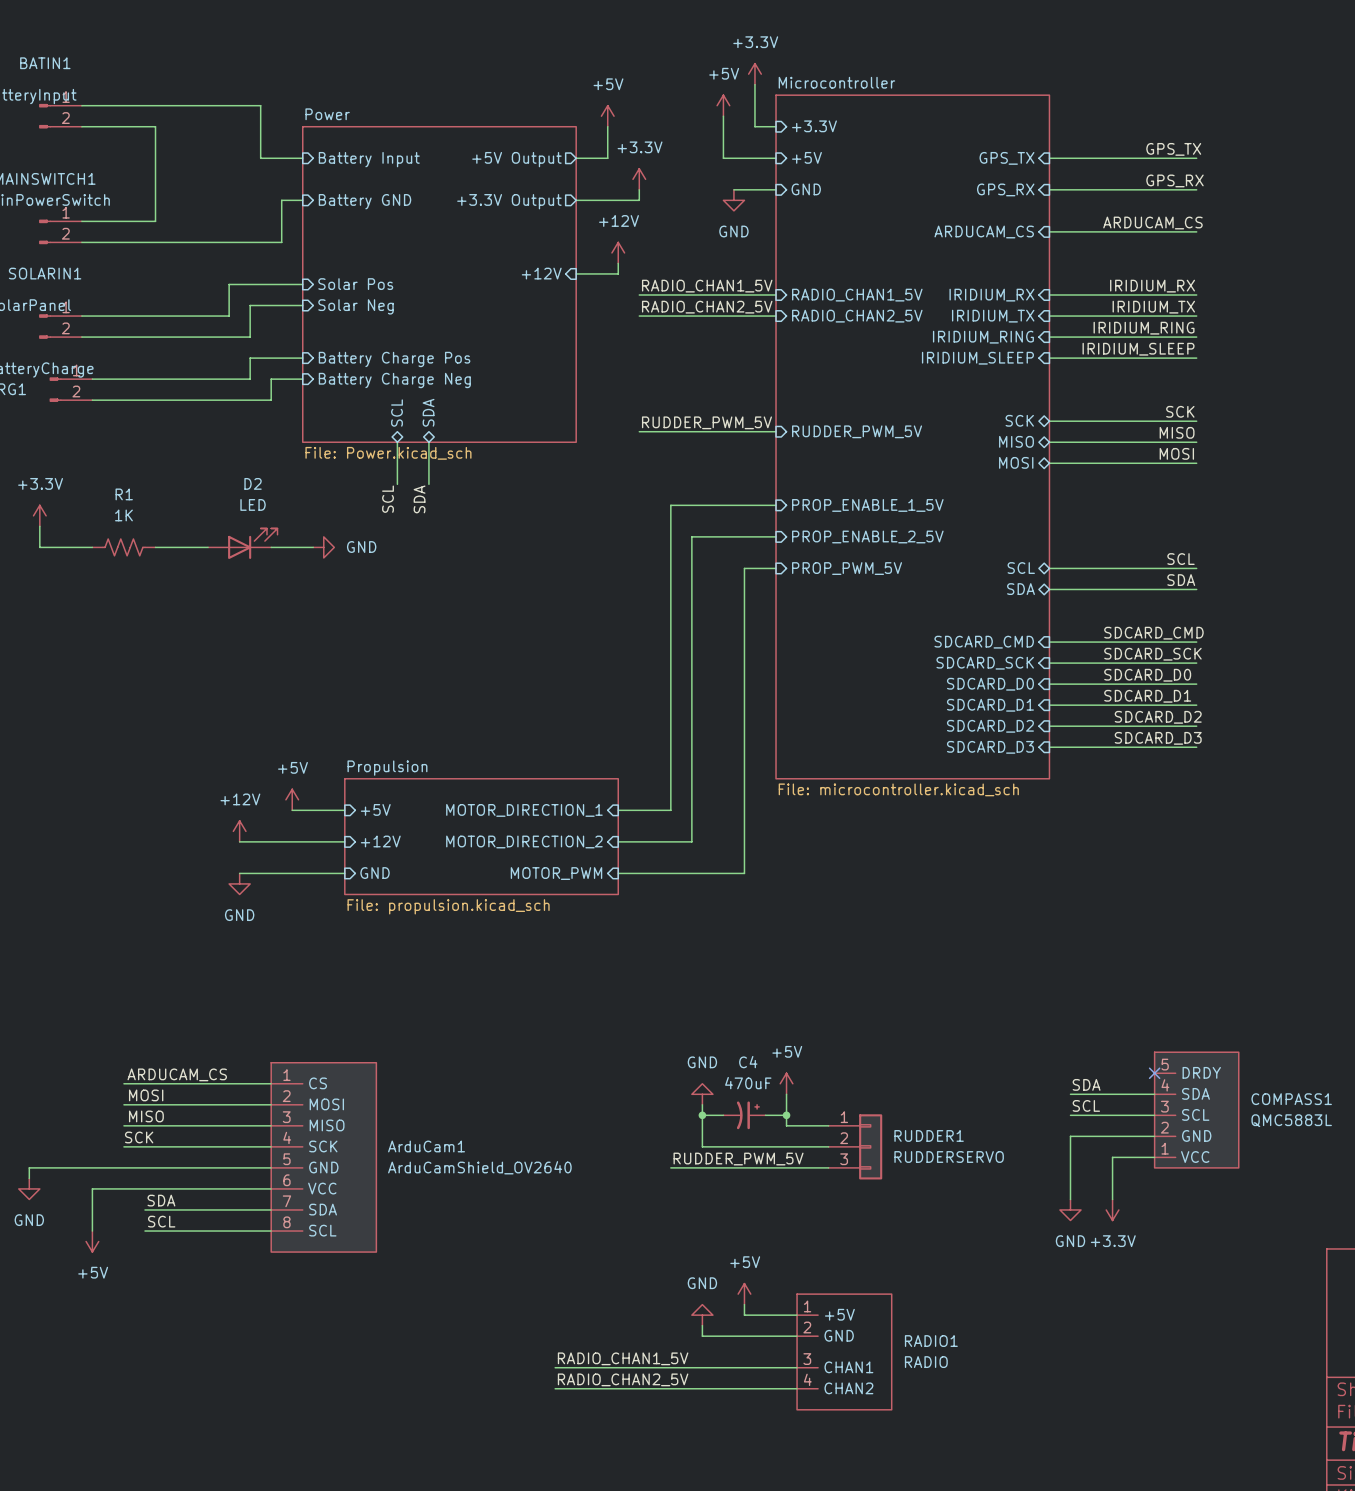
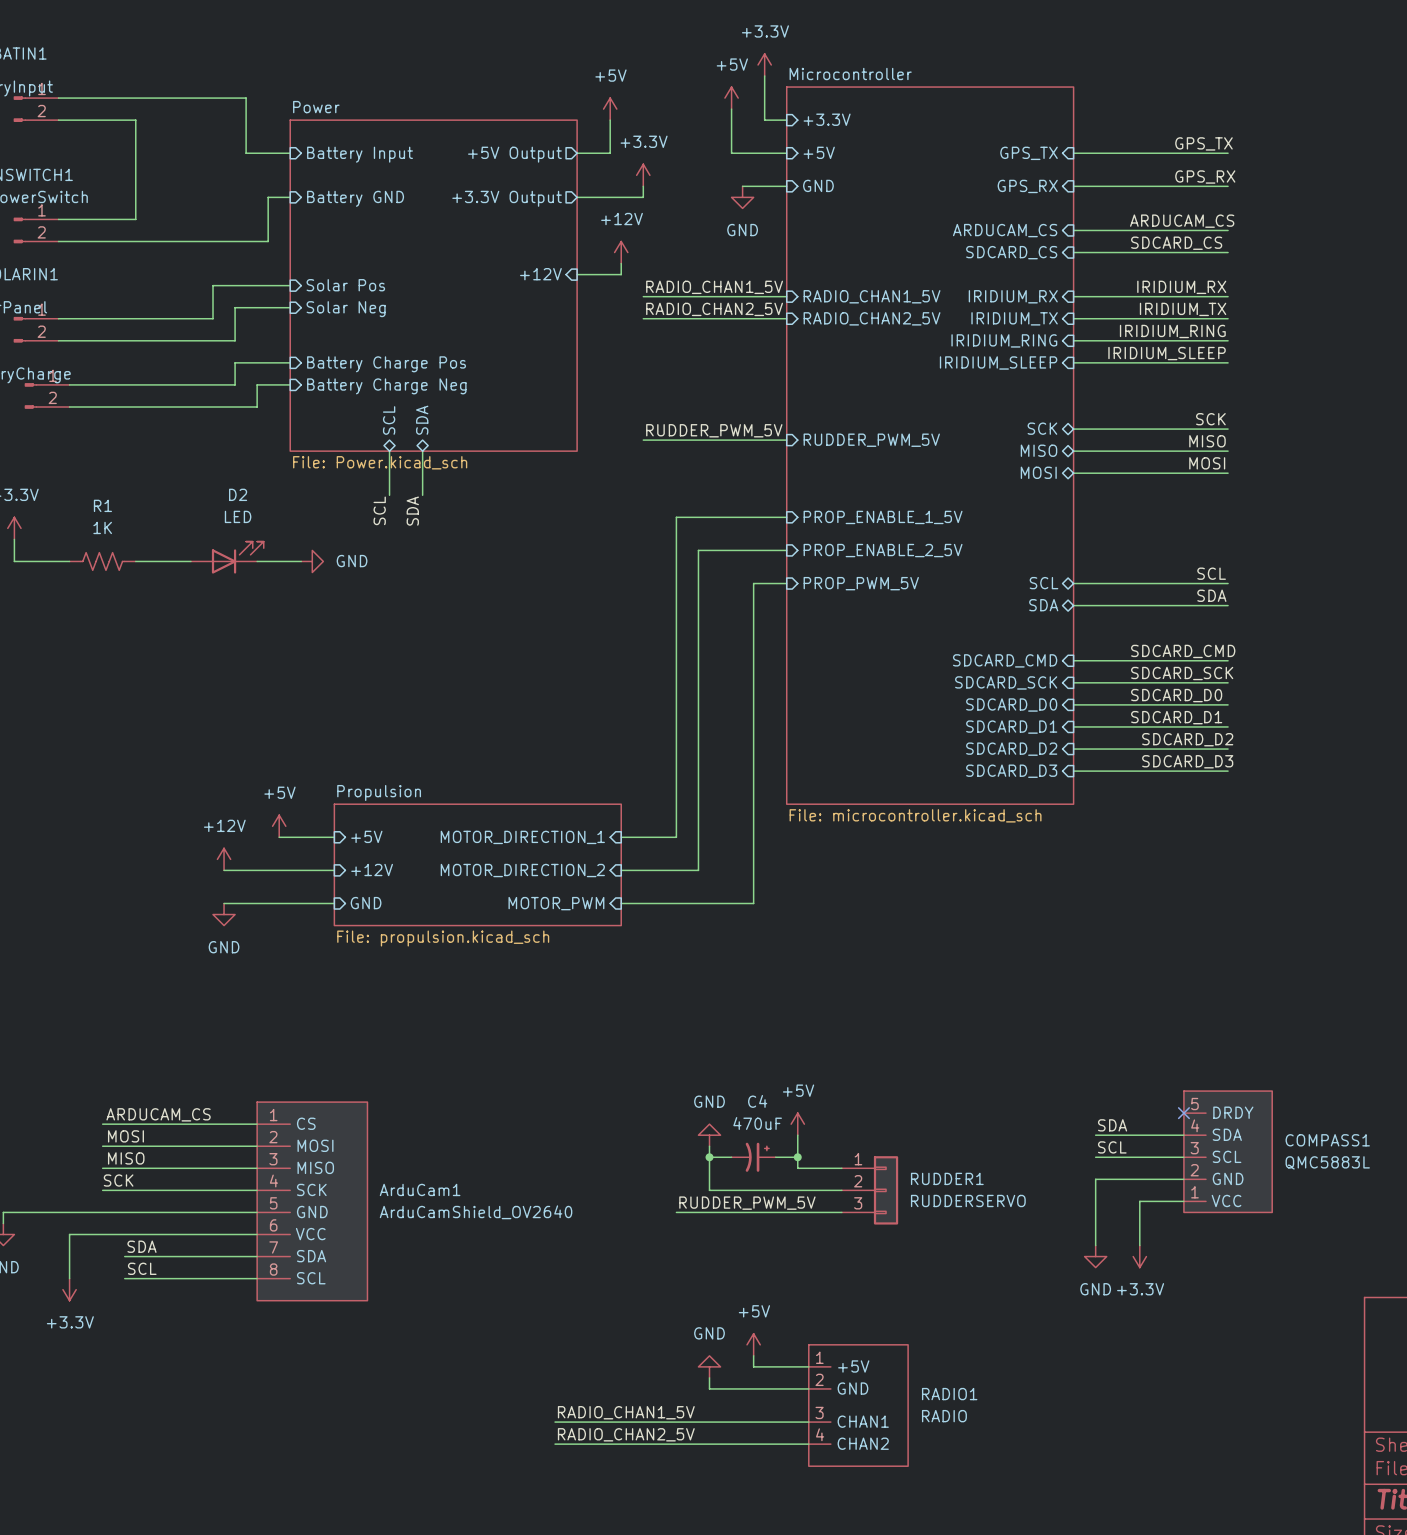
label: none -> SDCARD_CS (1176, 243)
wire: none -> (1073, 252) (1228, 252)
sheet pin: none -> SDCARD_CS (1011, 252)
power symbol: +5V (92, 1241) -> +3.3V (69, 1289)

